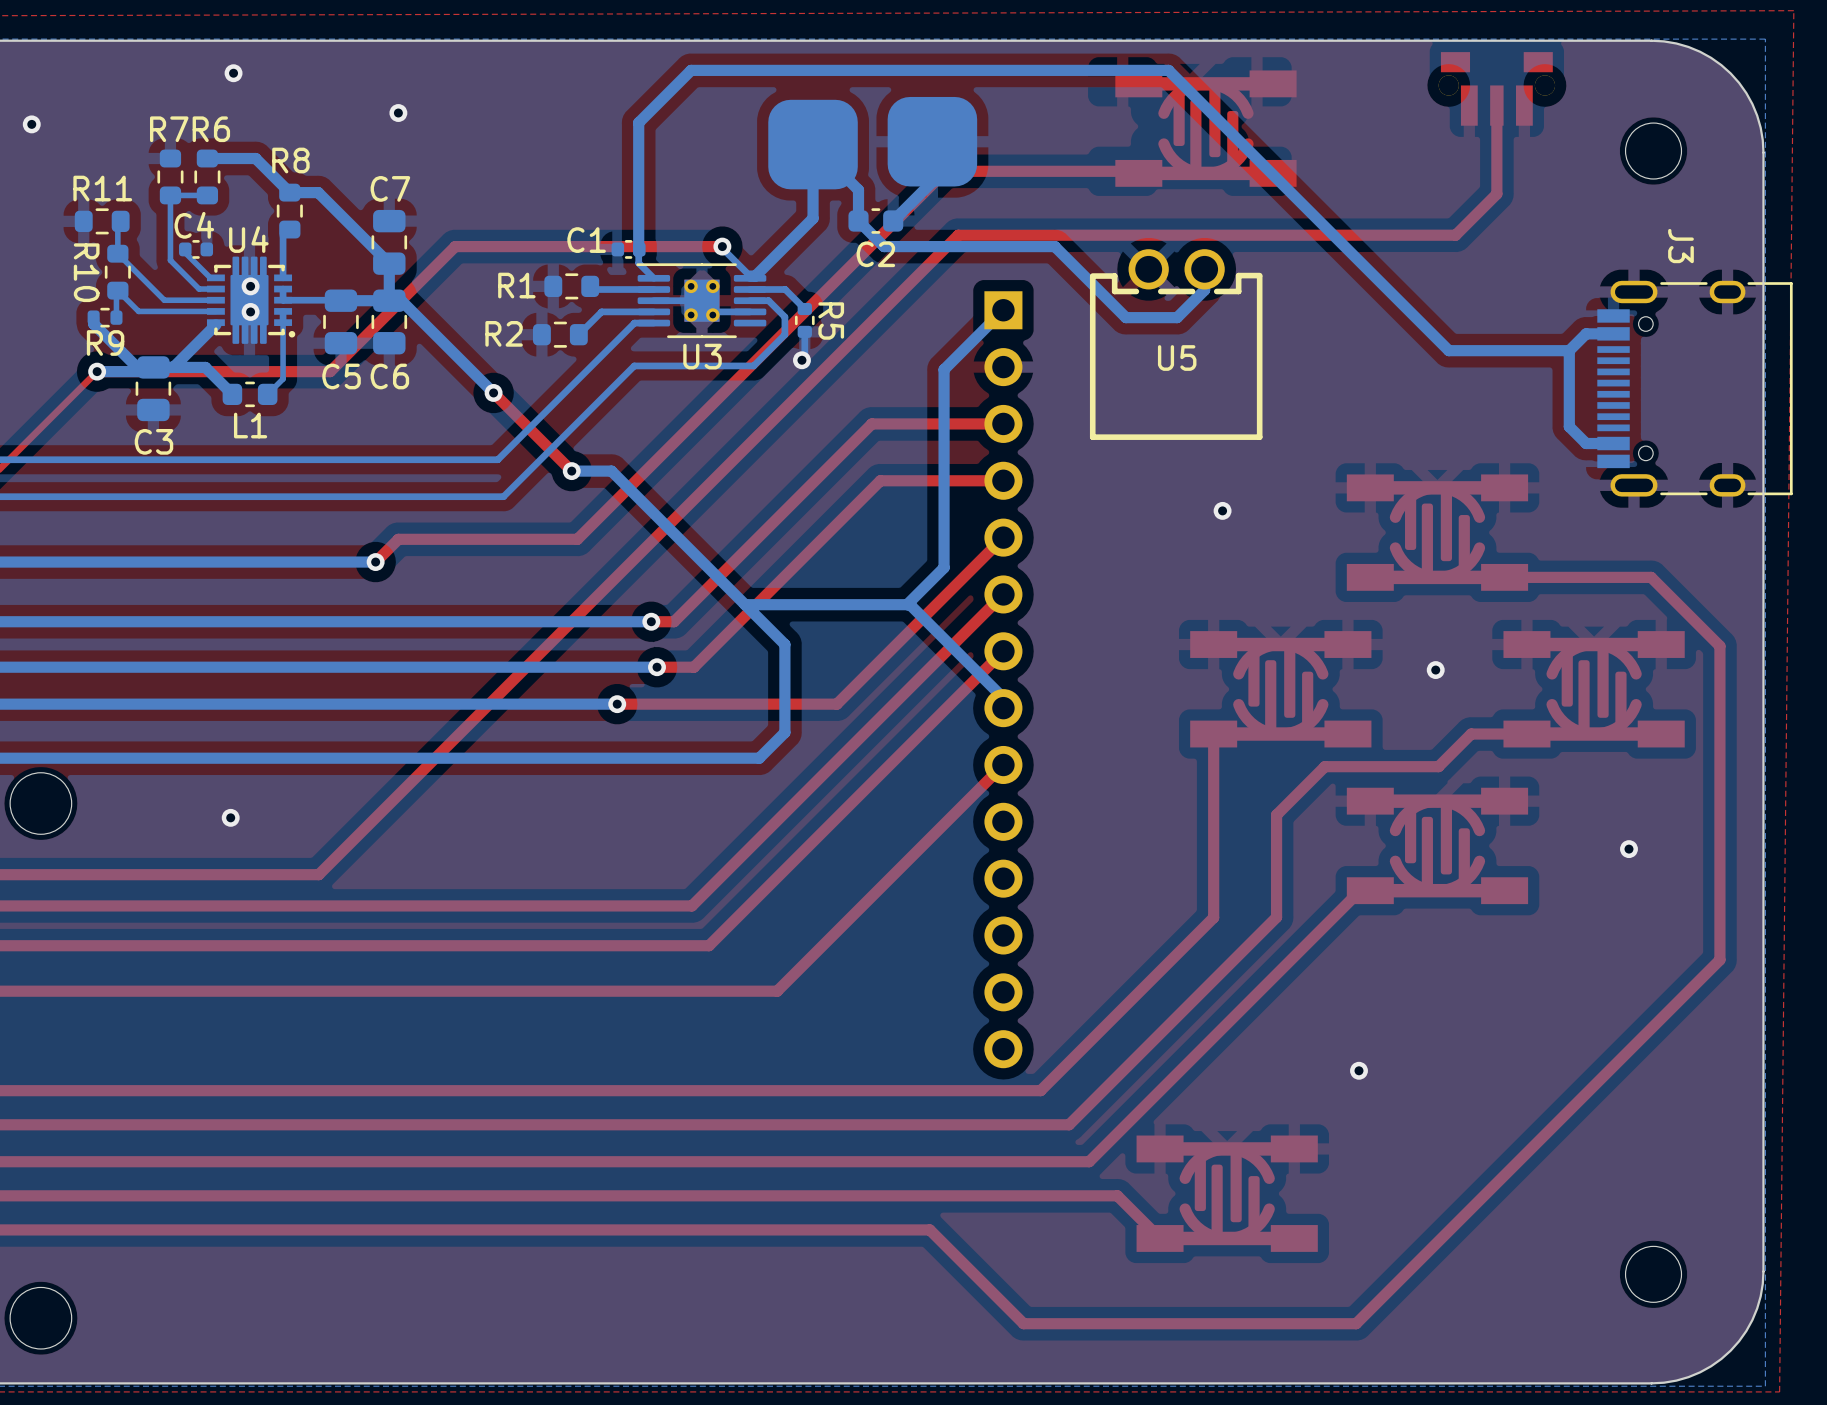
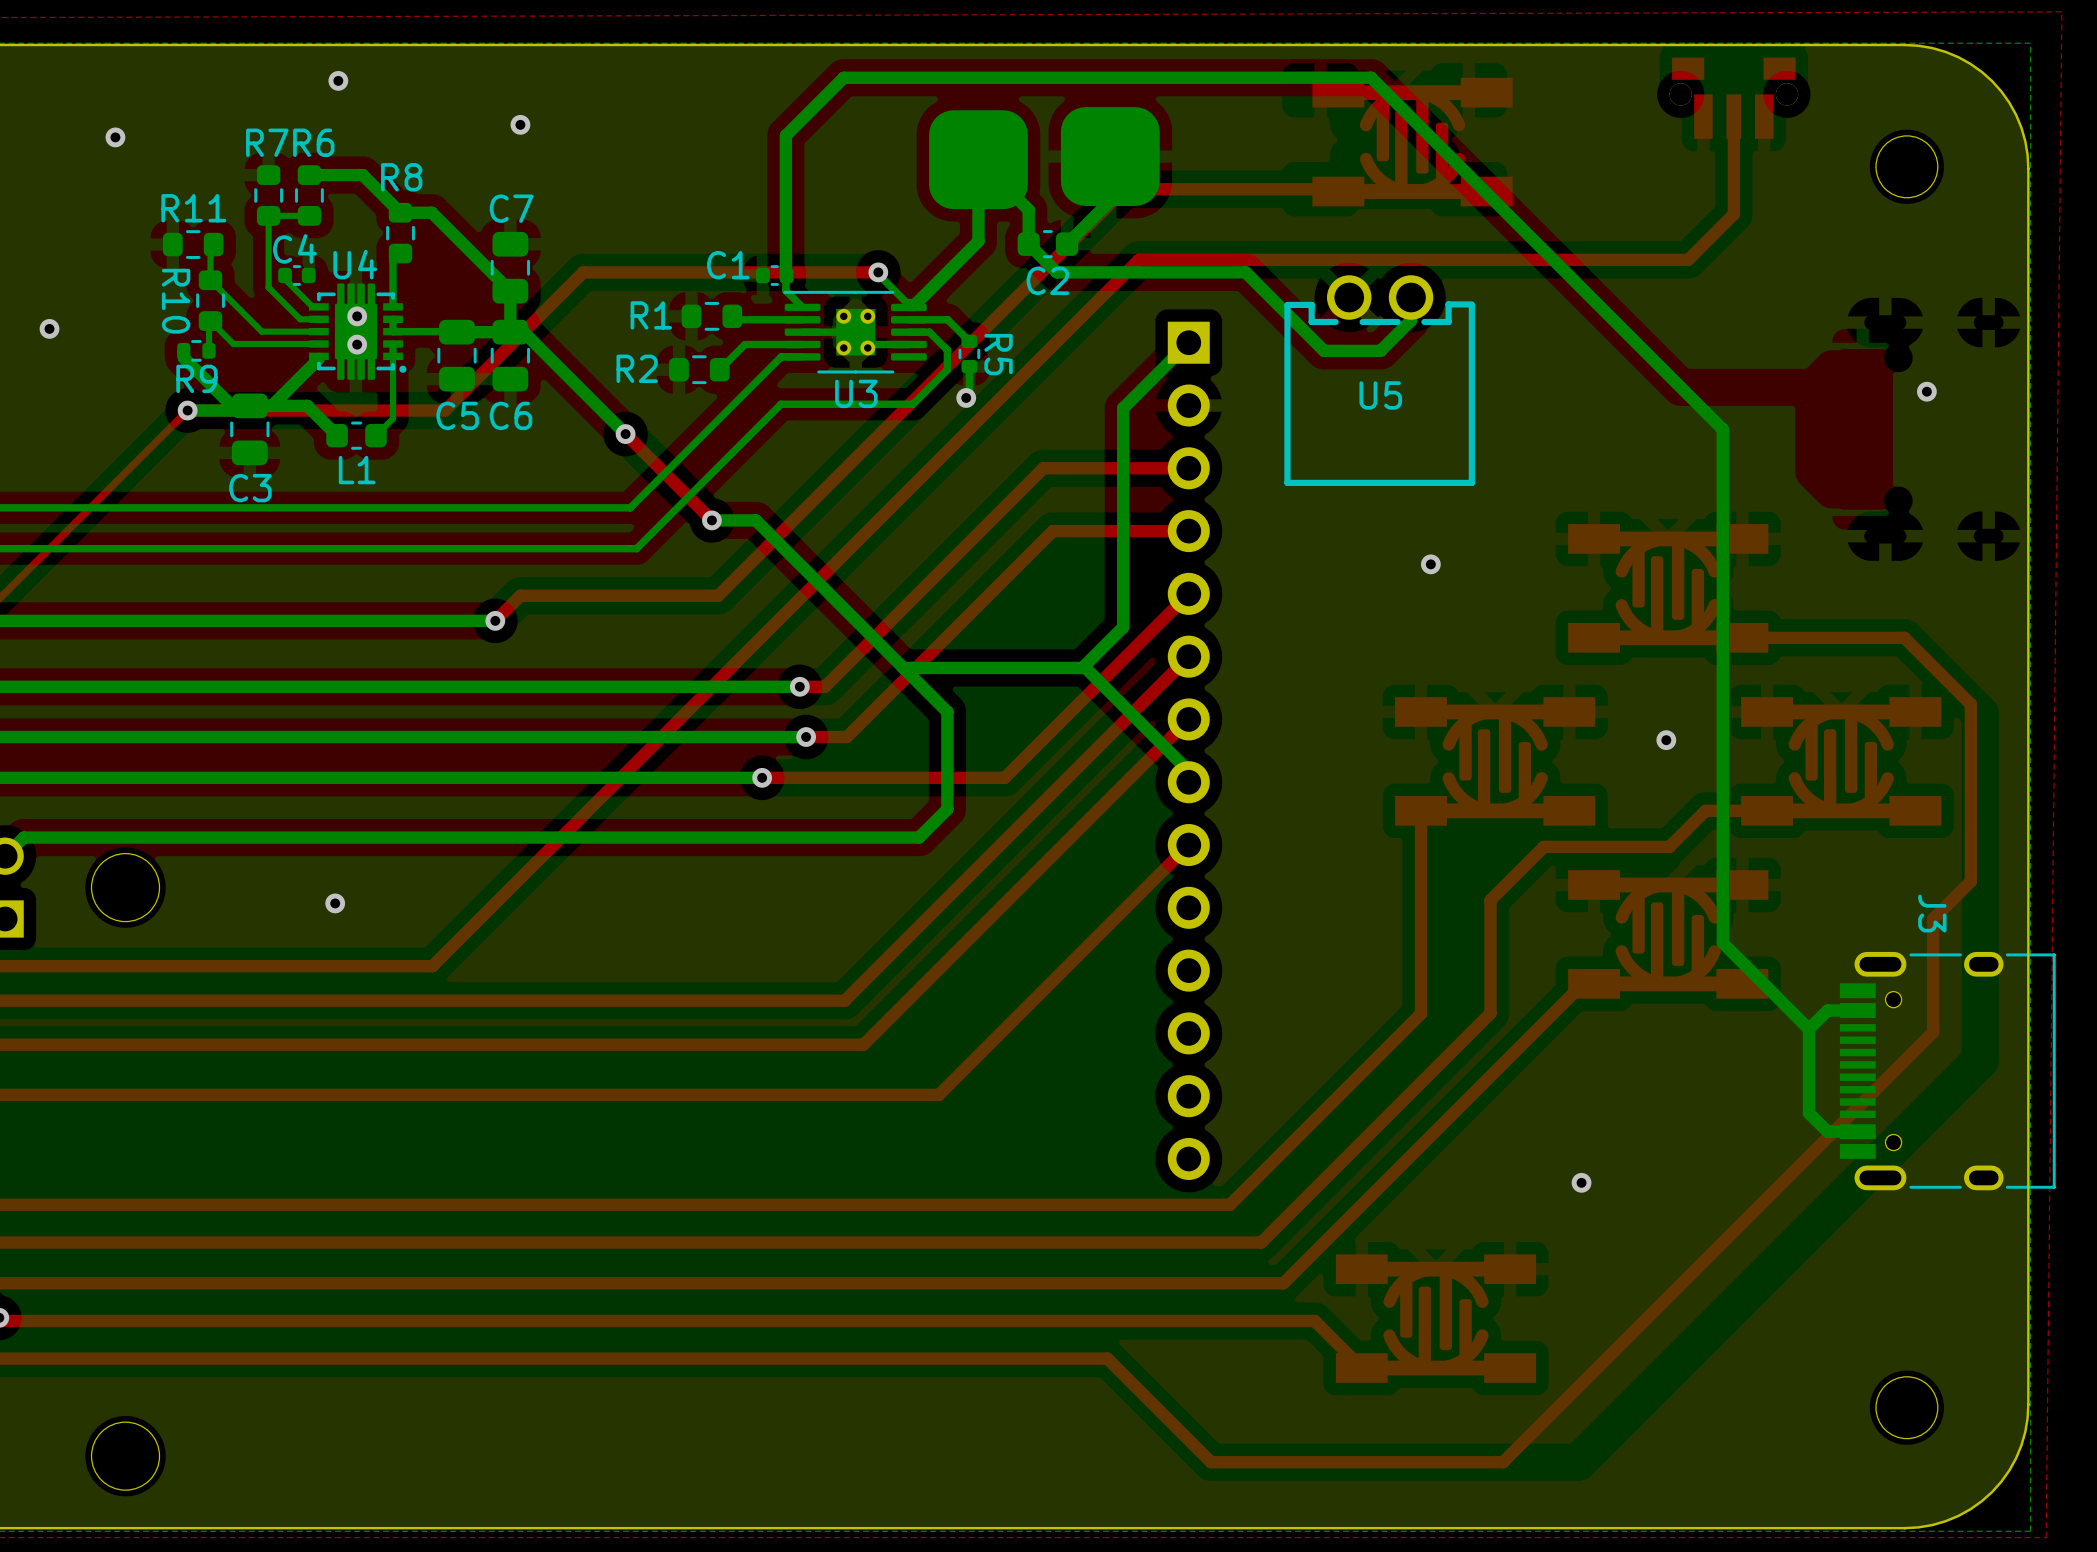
bottom track: (1613, 333) (1586, 333) (1569, 350) -> none
bottom track: (1569, 350) (1448, 350) -> (1808, 1029) (1722, 942) (1722, 429) (1680, 387)
bottom track: (1569, 350) (1569, 426) (1586, 443) (1613, 443) -> none
via: none -> (1926, 391)
J3 position: (1694, 388) -> (1947, 1071)
top track: (1711, 637) (1719, 646) (1719, 959) (1356, 1323) (1287, 1323) -> (1970, 704) (1970, 881) (1933, 919) (1933, 1032) (1503, 1462)
via: (1628, 849) -> none
bottom track: none -> (1857, 1010) (1827, 1010) (1808, 1029)
bottom track: none -> (1808, 1029) (1808, 1113) (1827, 1131) (1857, 1131)

